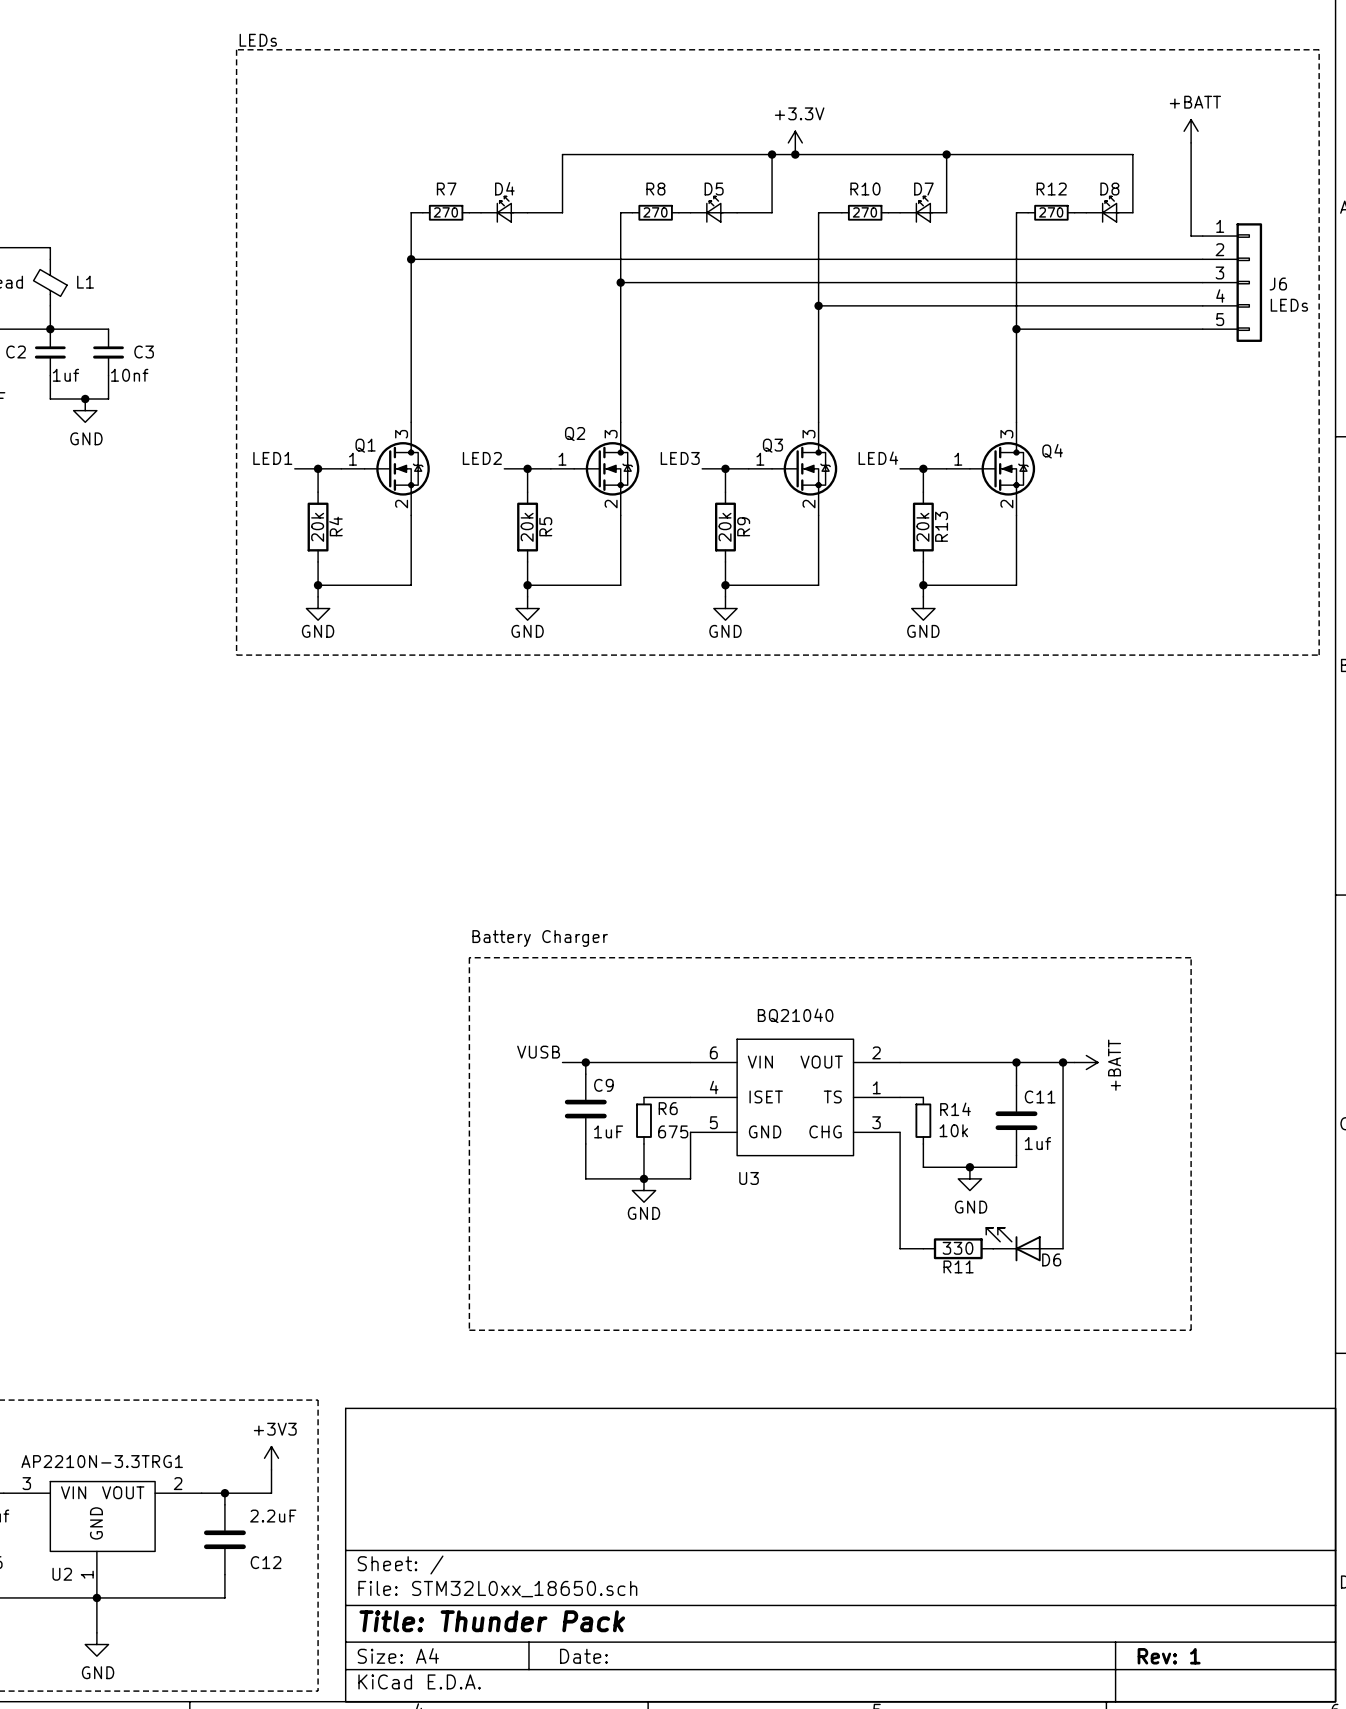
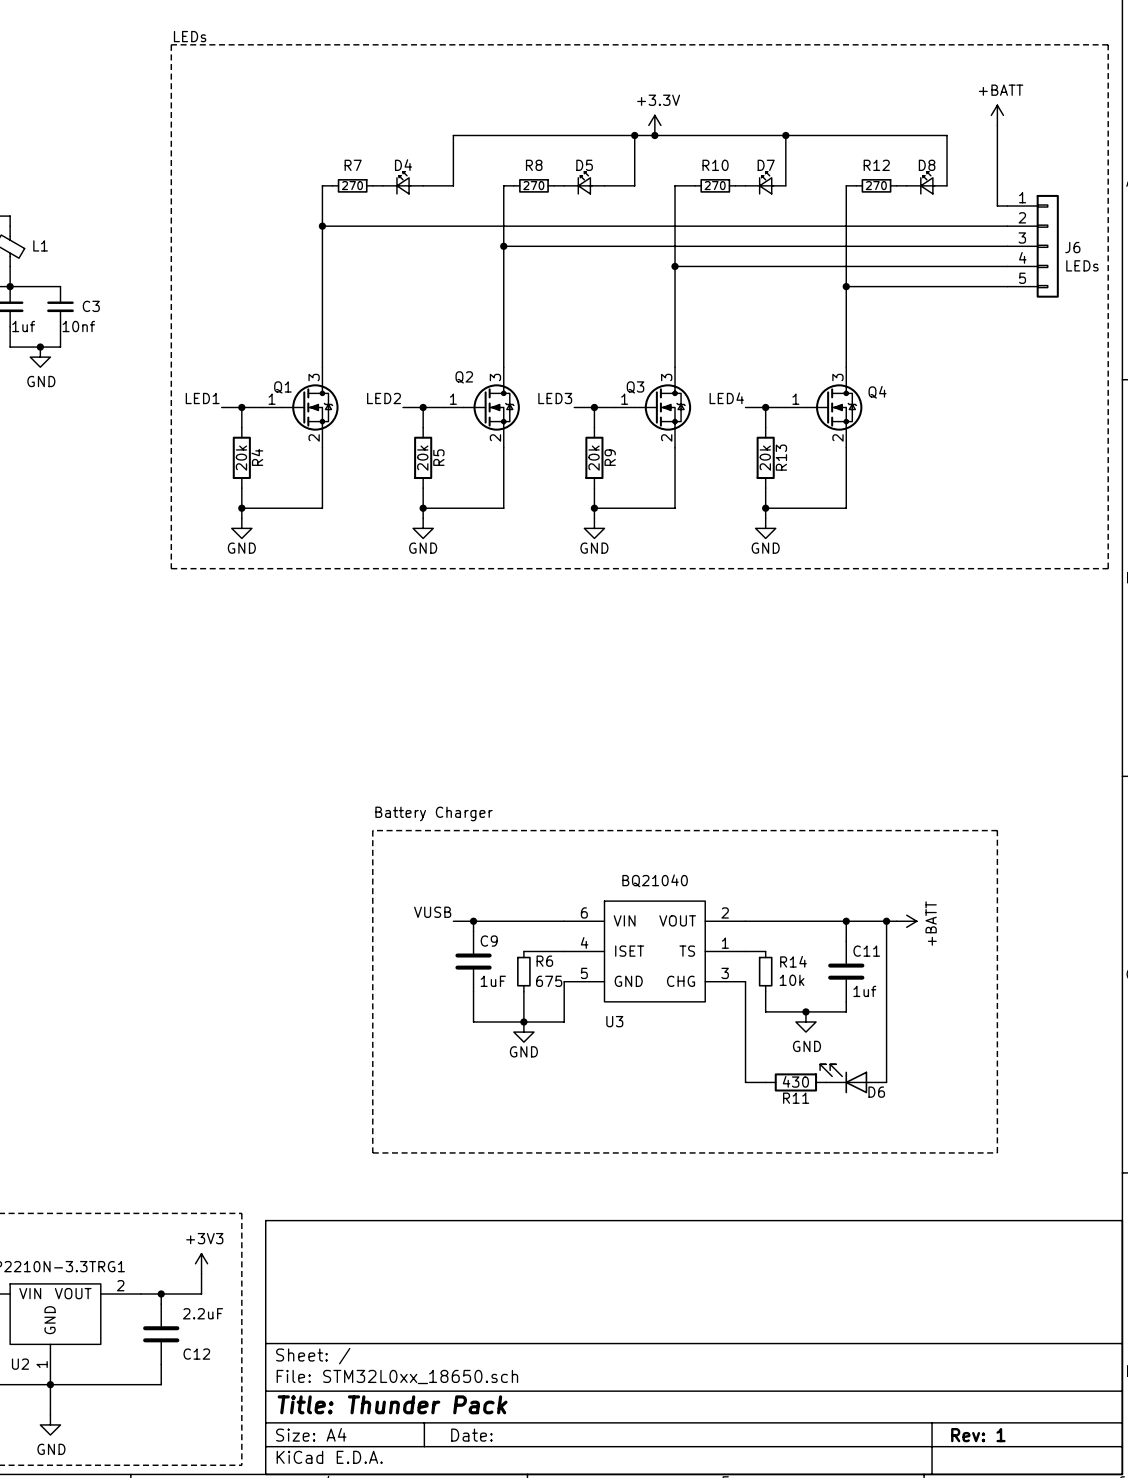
R11 value: 330 (958, 1248) -> 430 (795, 1081)

